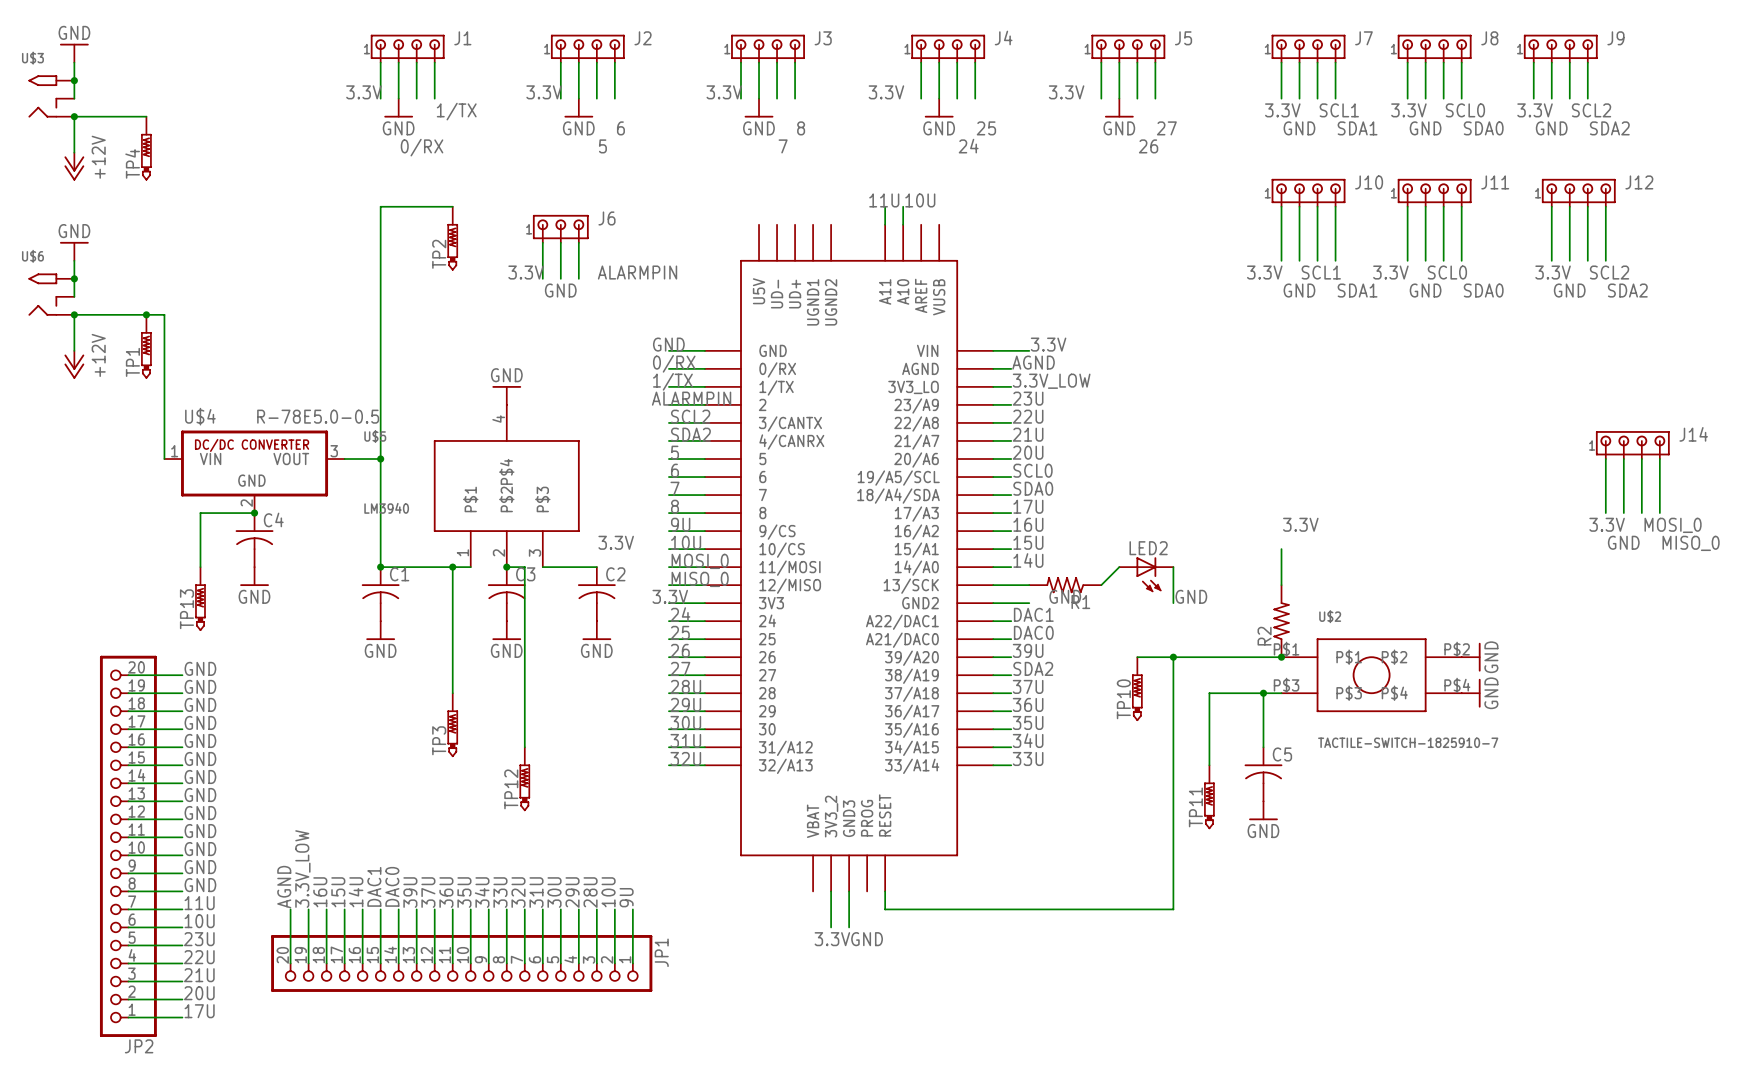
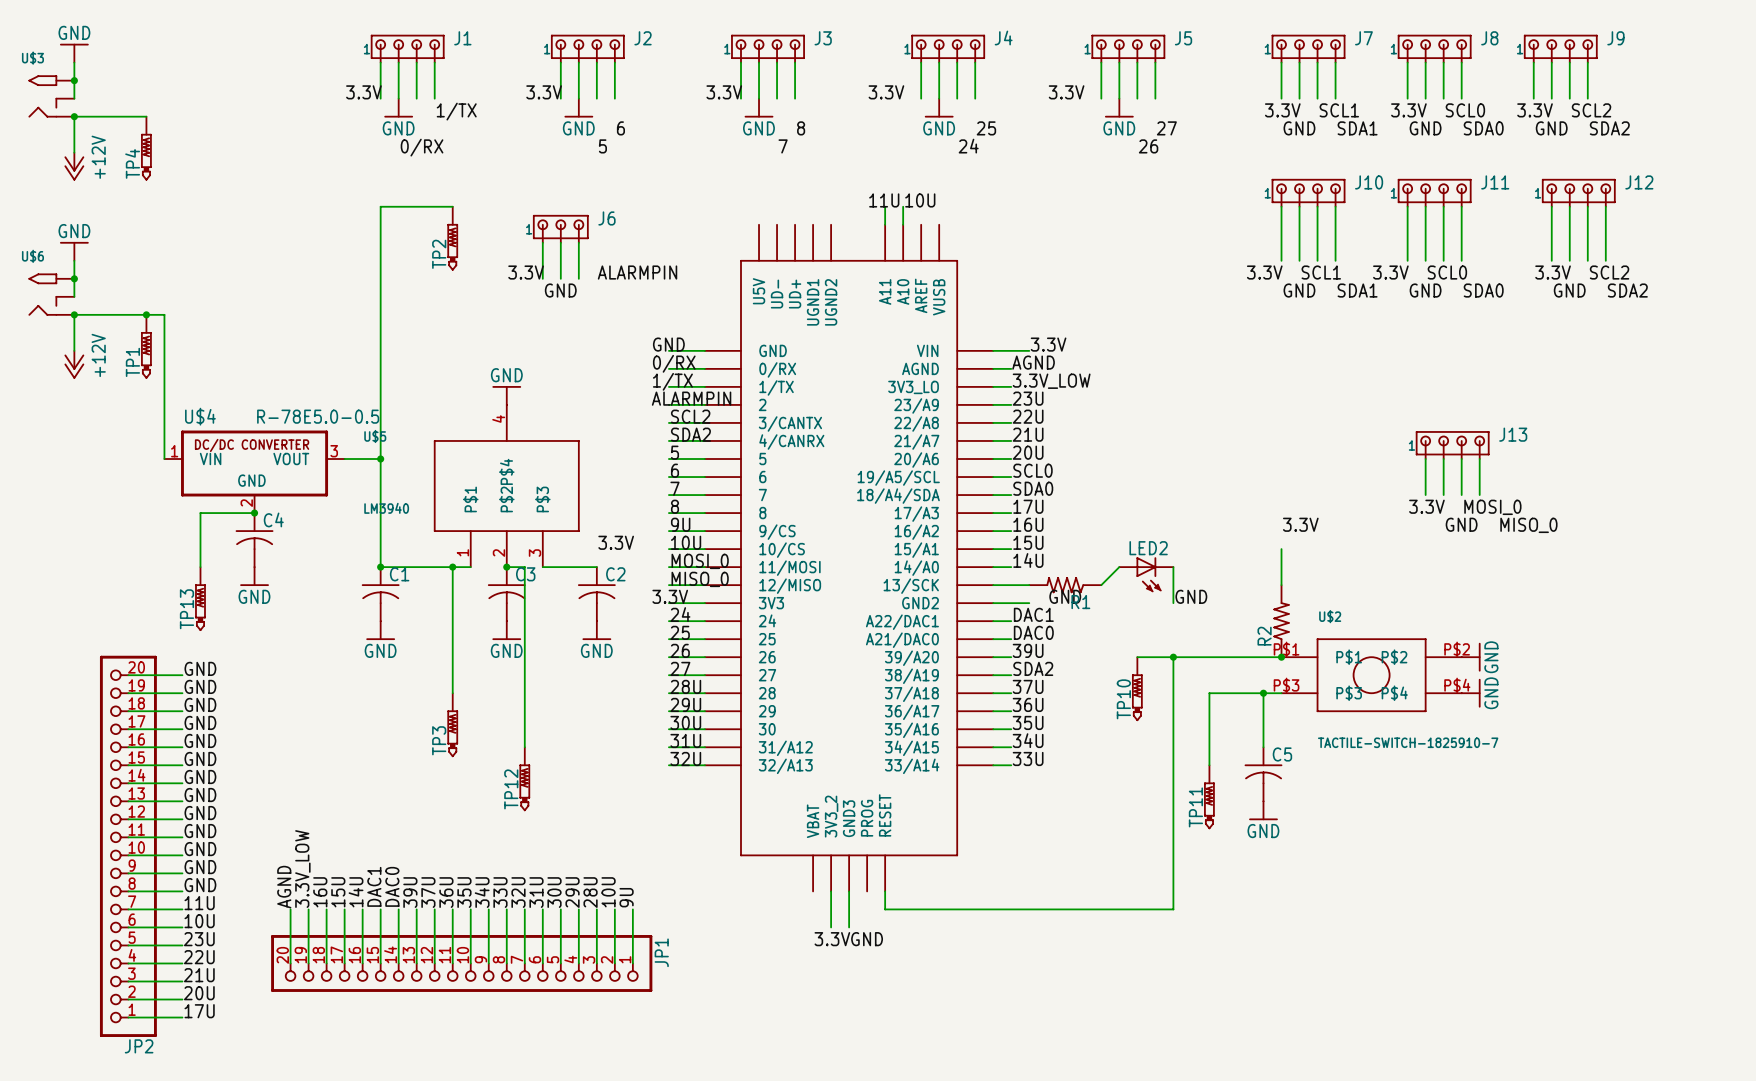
J13: none -> (1452, 445)
J14: (1632, 445) -> none
wire: none -> (1425, 459) (1425, 495)
wire: none -> (1443, 459) (1443, 495)
wire: none -> (1461, 459) (1461, 495)
wire: none -> (1479, 459) (1479, 495)
wire: (1605, 459) (1605, 513) -> none
wire: (1623, 459) (1623, 513) -> none
wire: (1641, 459) (1641, 513) -> none
wire: (1659, 459) (1659, 513) -> none
label: none -> 3.3V (1426, 506)
label: none -> MOSI_0 (1492, 507)
label: 3.3V (1607, 524) -> none
label: MOSI_0 (1673, 525) -> none
label position: GND (1623, 542) -> GND (1461, 524)
label position: MISO_0 (1691, 543) -> MISO_0 (1528, 525)

